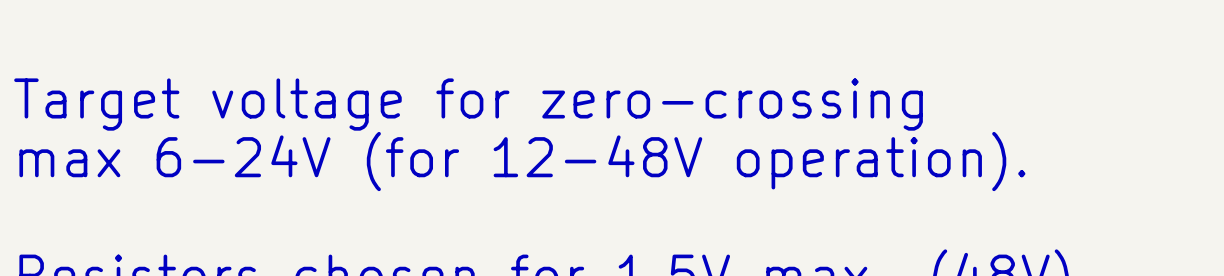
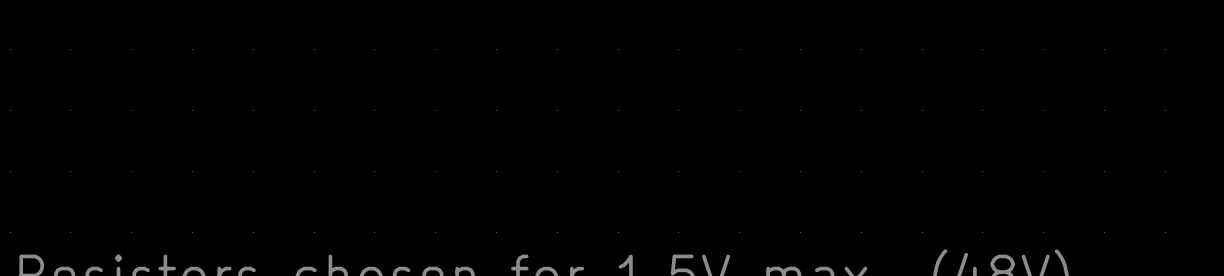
text: Target voltage for zero-crossing (468, 104) -> none
text: max 6-24V (for 12-48V operation). (522, 161) -> none

